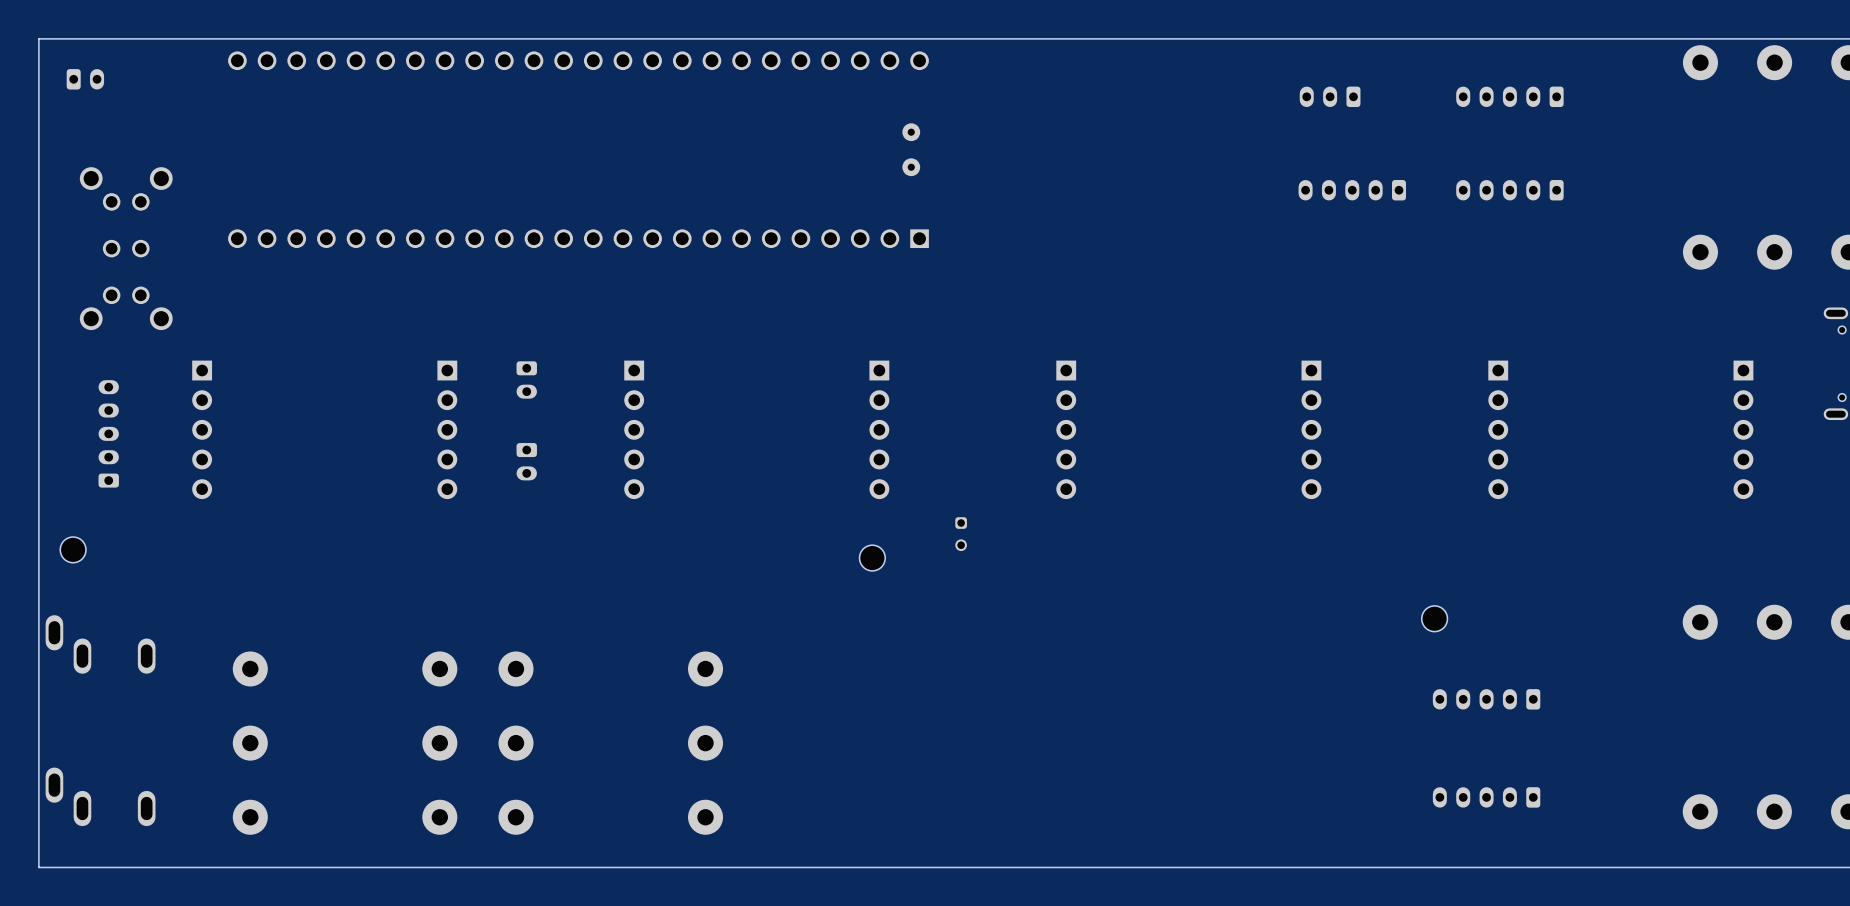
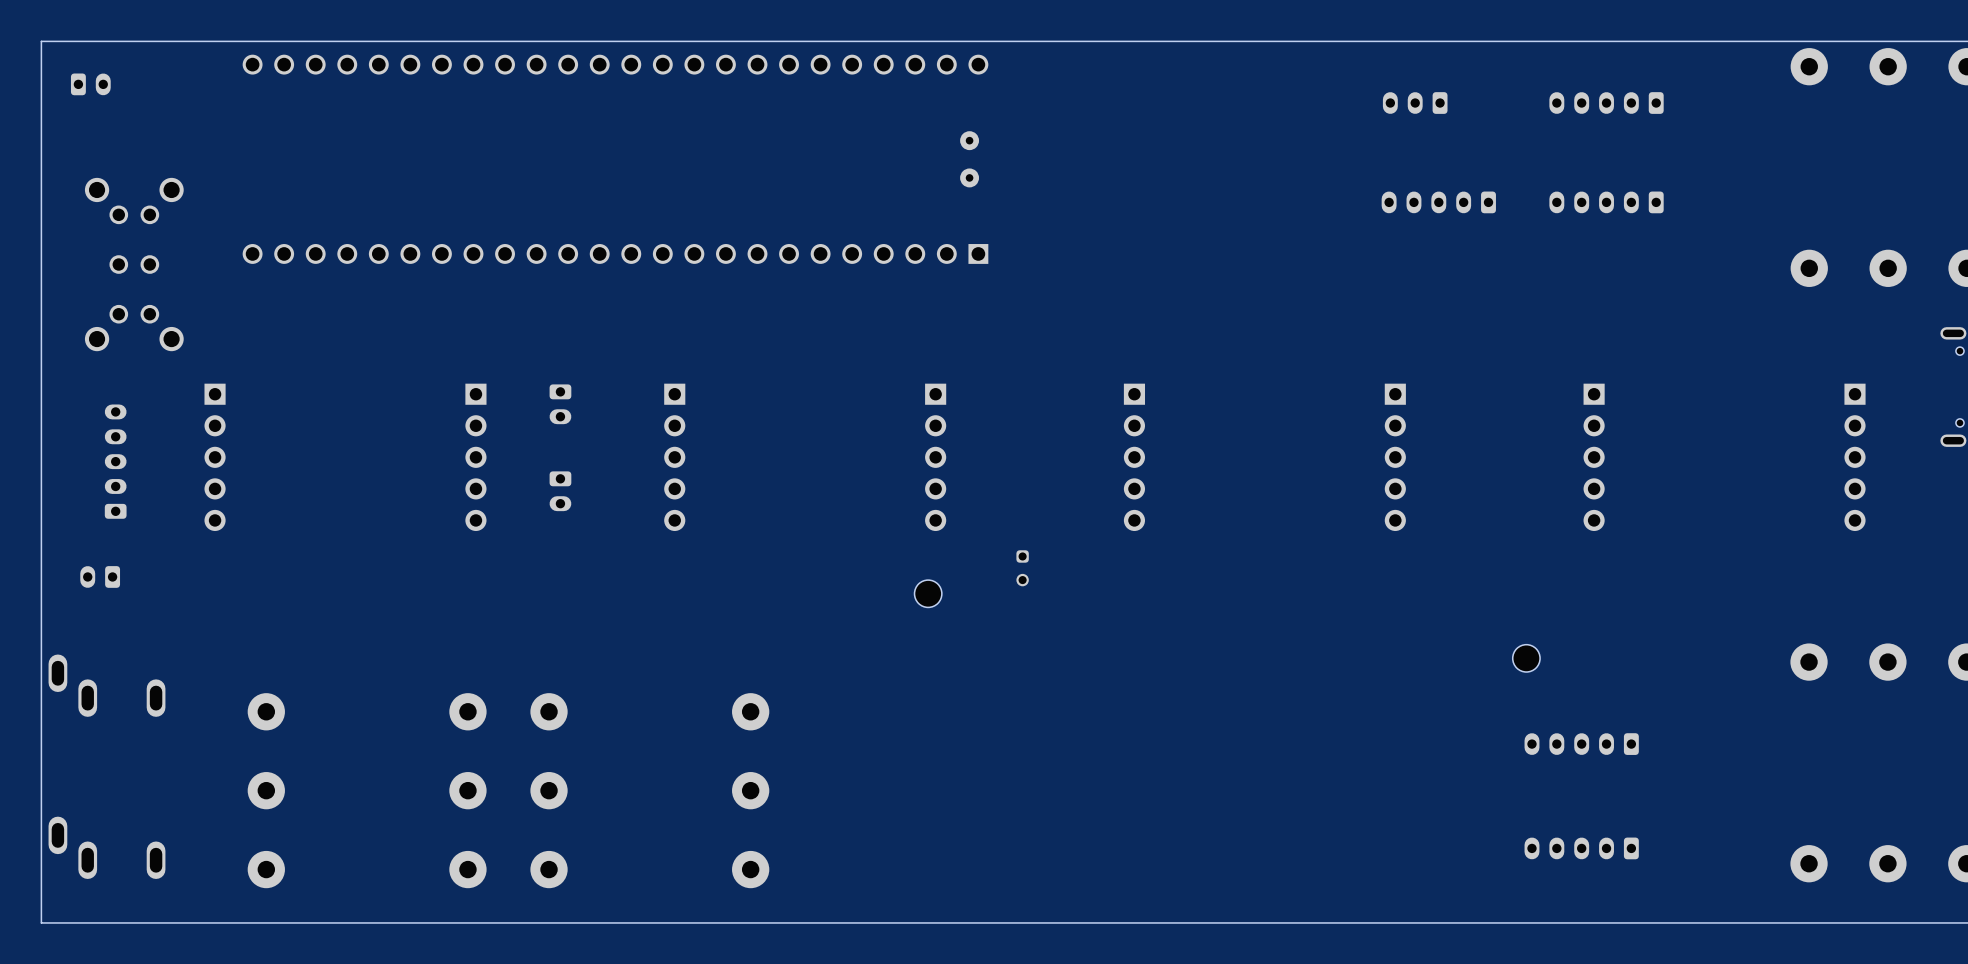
part: none -> (100, 576)
part: (73, 549) -> none

